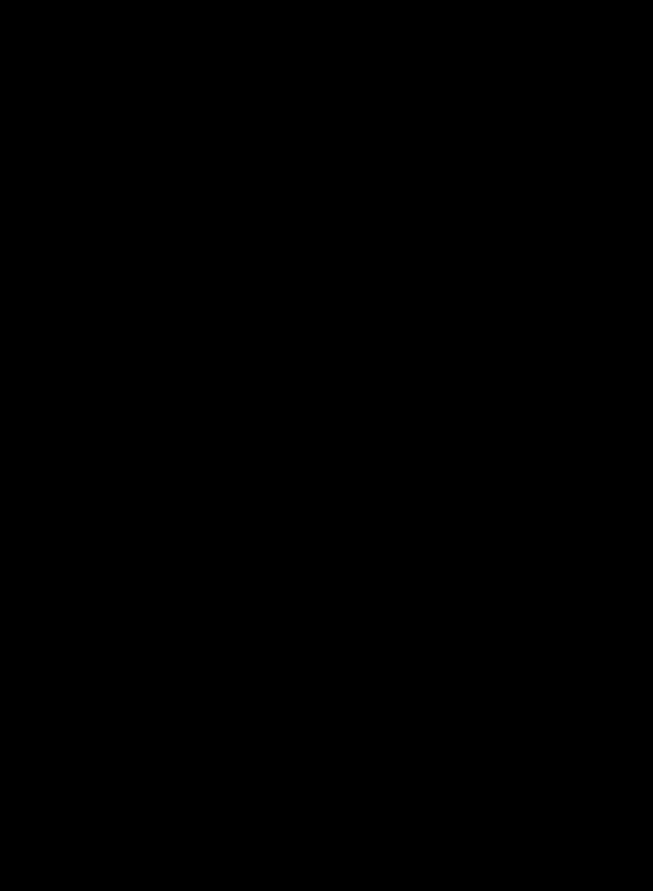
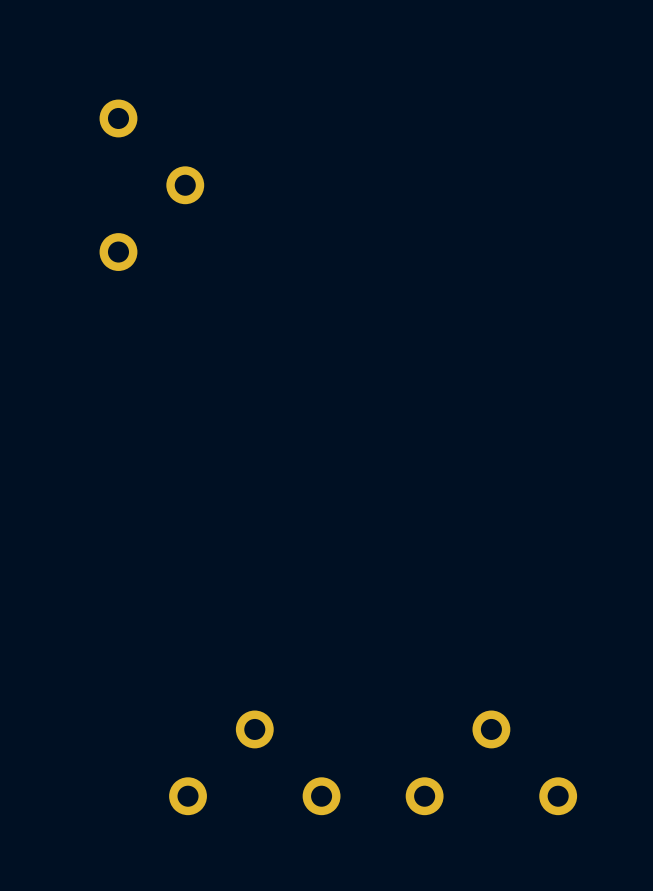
part: none -> (151, 185)
part: none -> (254, 762)
part: none -> (491, 762)

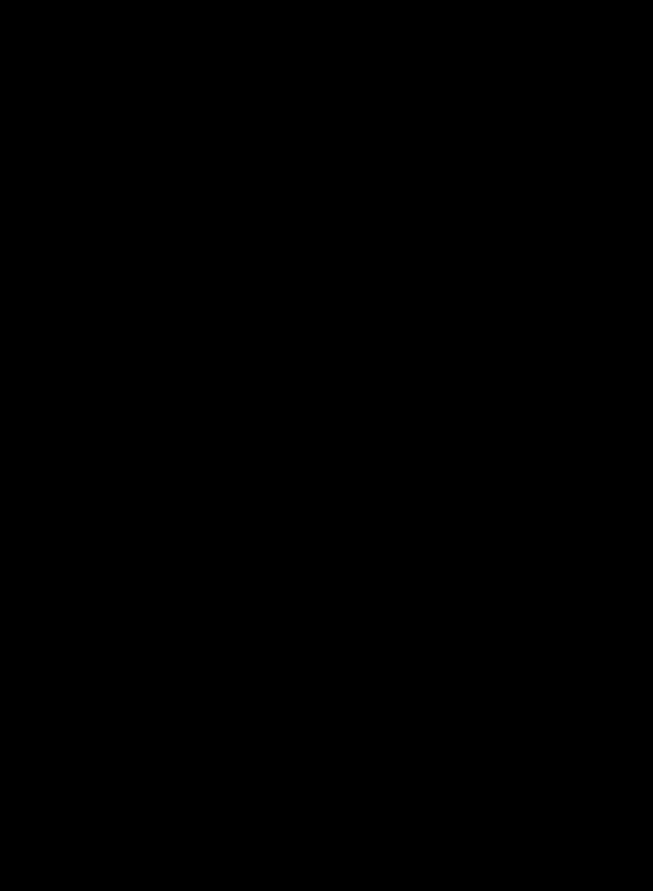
part: (151, 185) -> none
part: (254, 762) -> none
part: (491, 762) -> none

